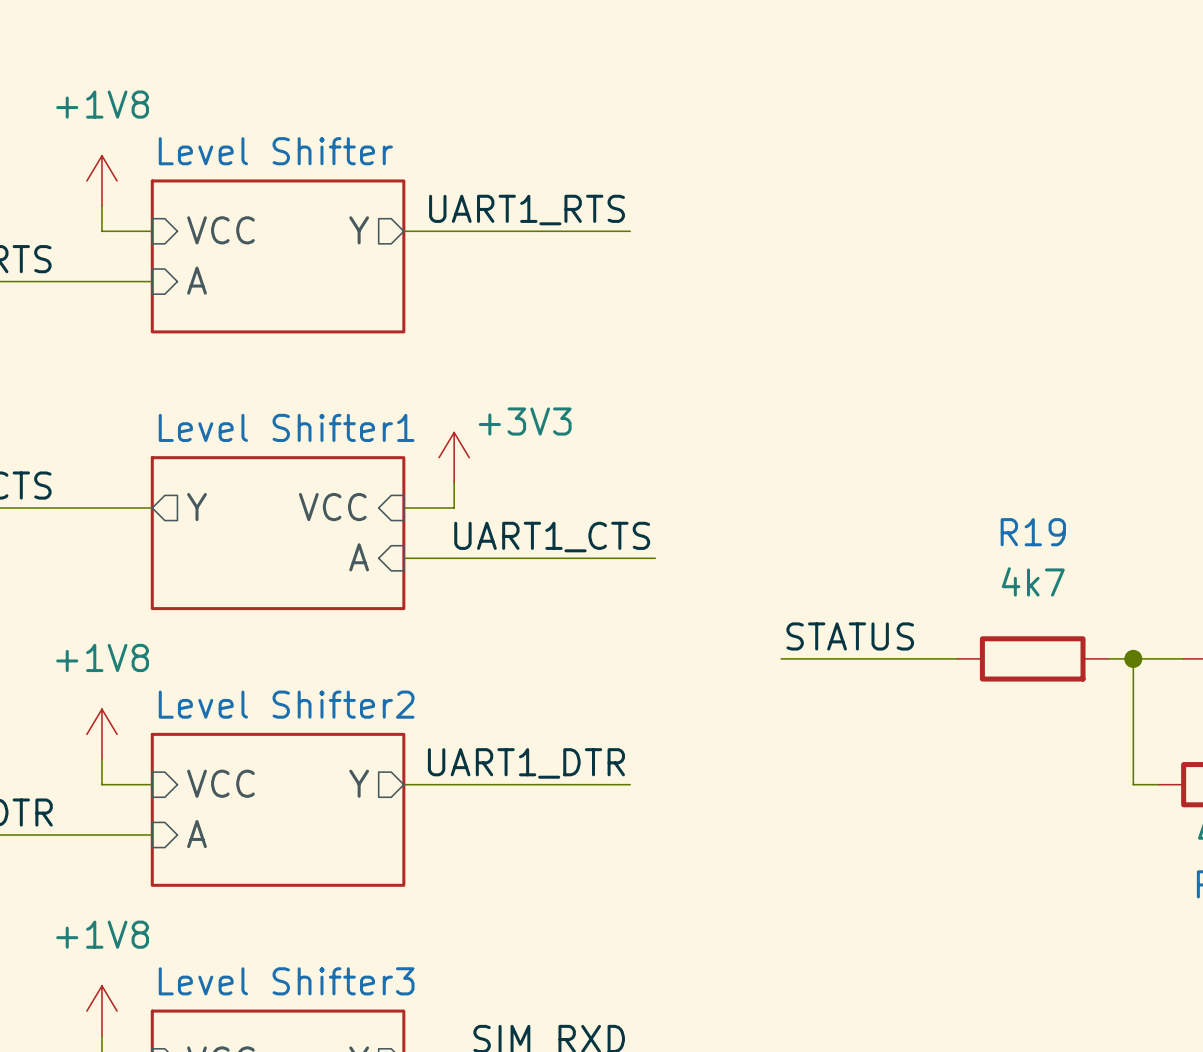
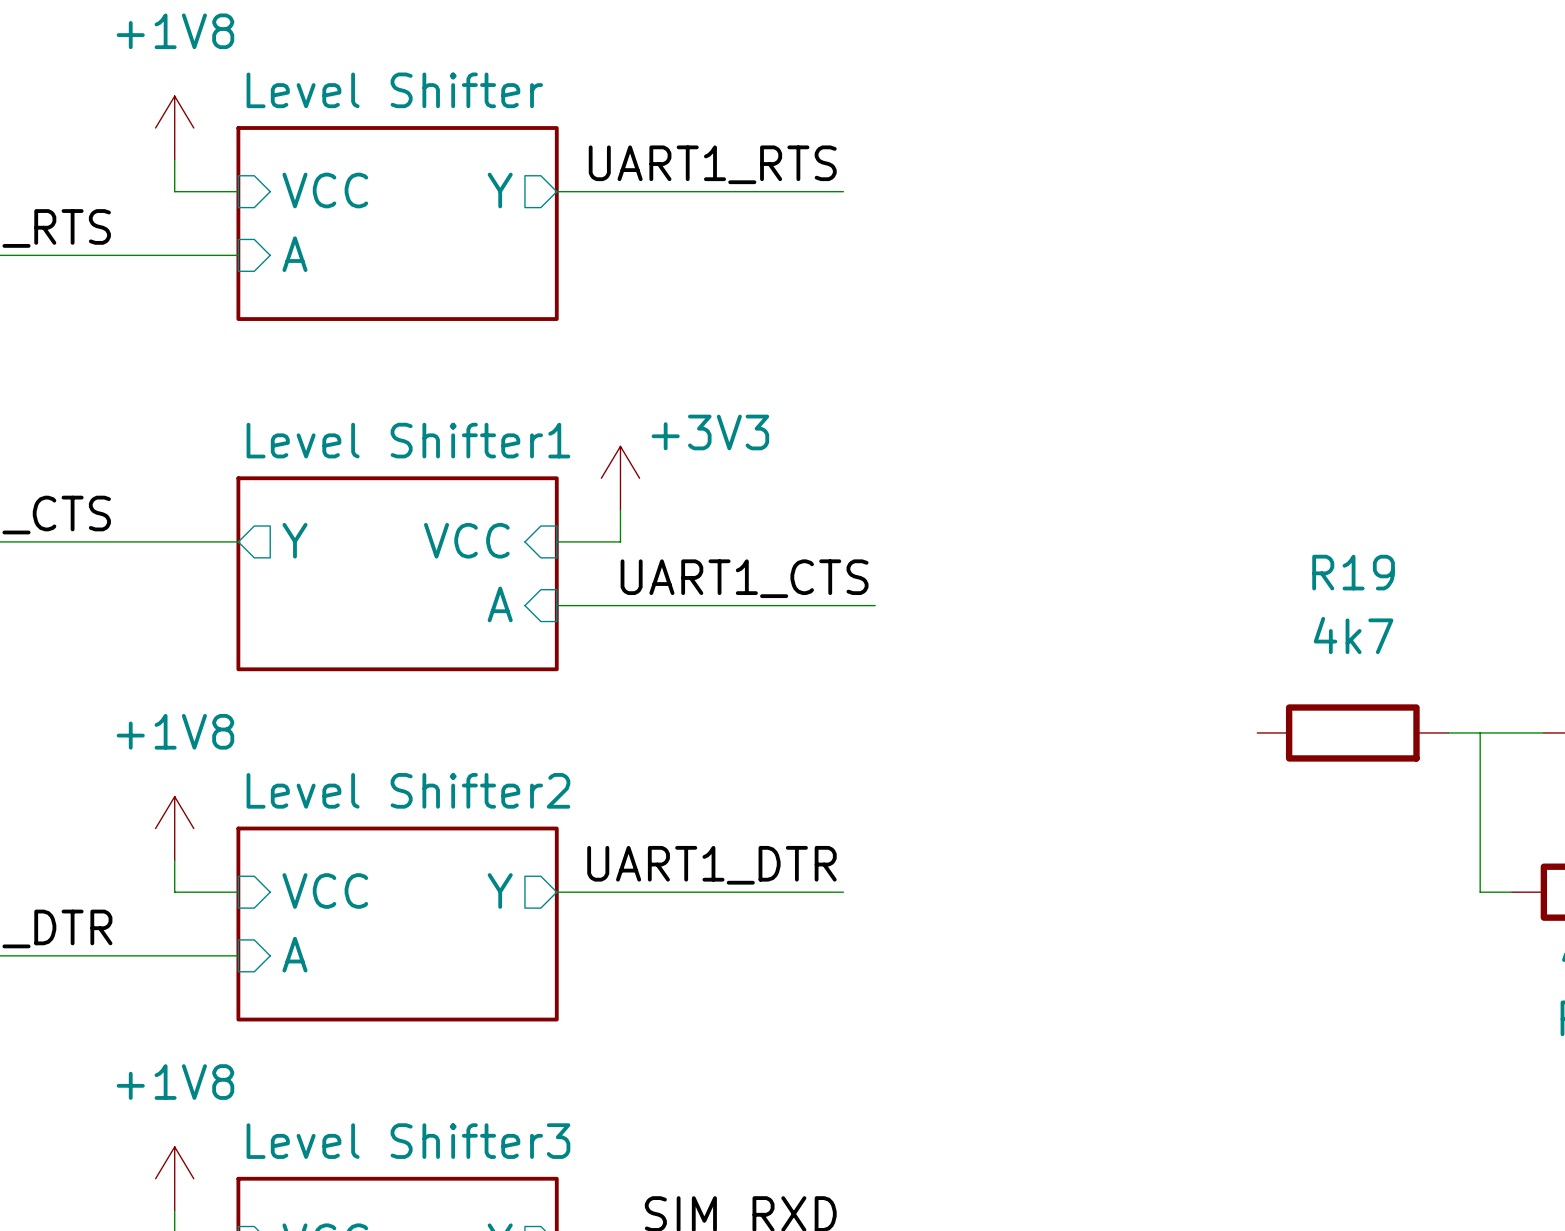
label: STATUS (850, 636) -> none
wire: (781, 658) (957, 658) -> none
junction: (1133, 658) -> none

